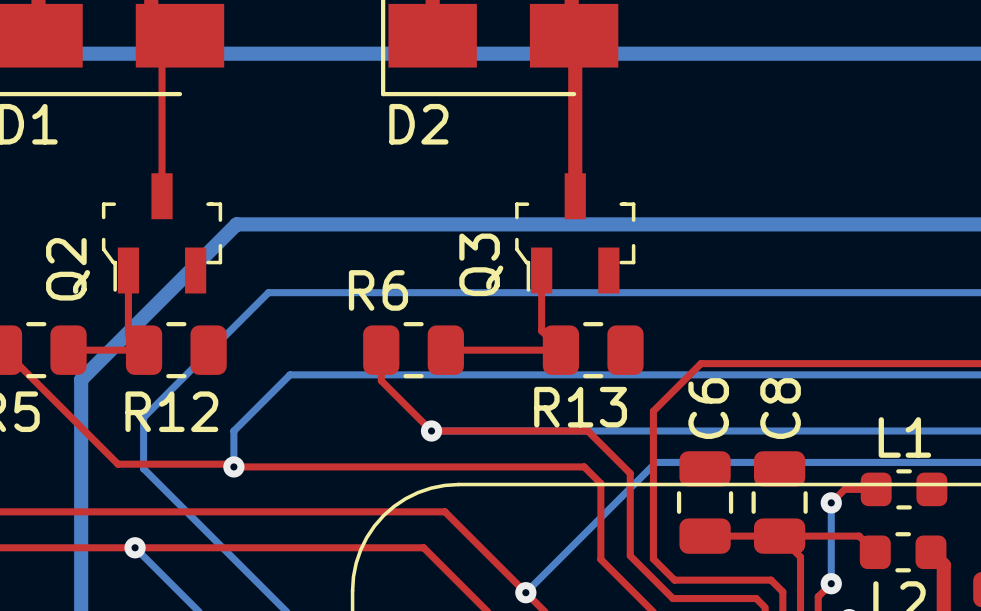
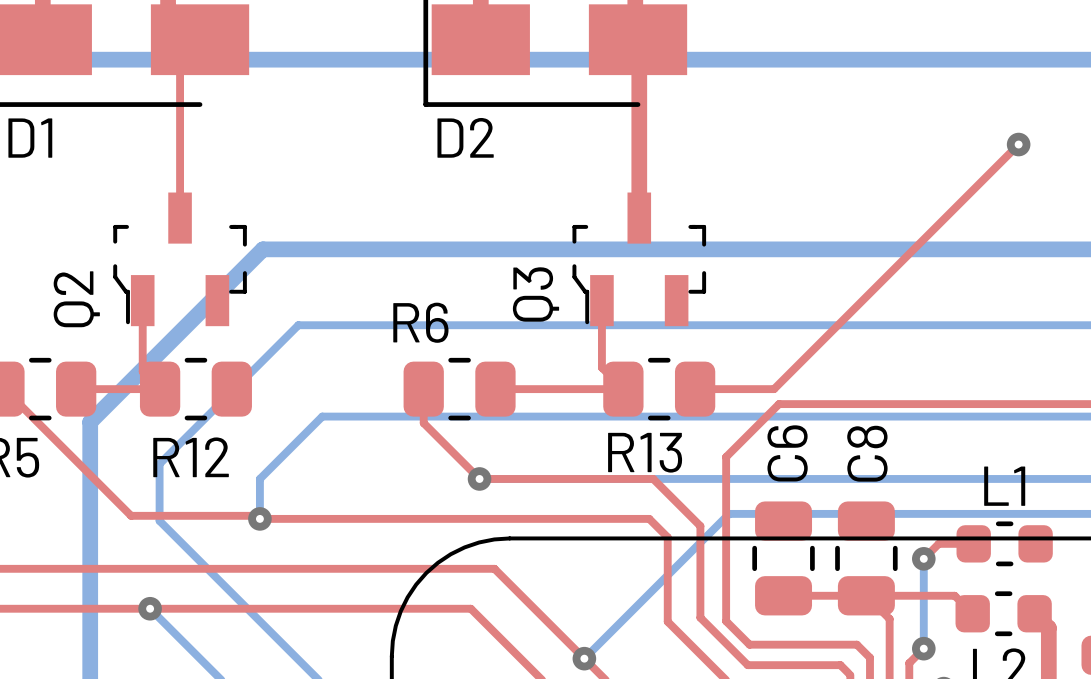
top track: none -> (1018, 144) (774, 389) (695, 389)
via: none -> (1018, 144)

